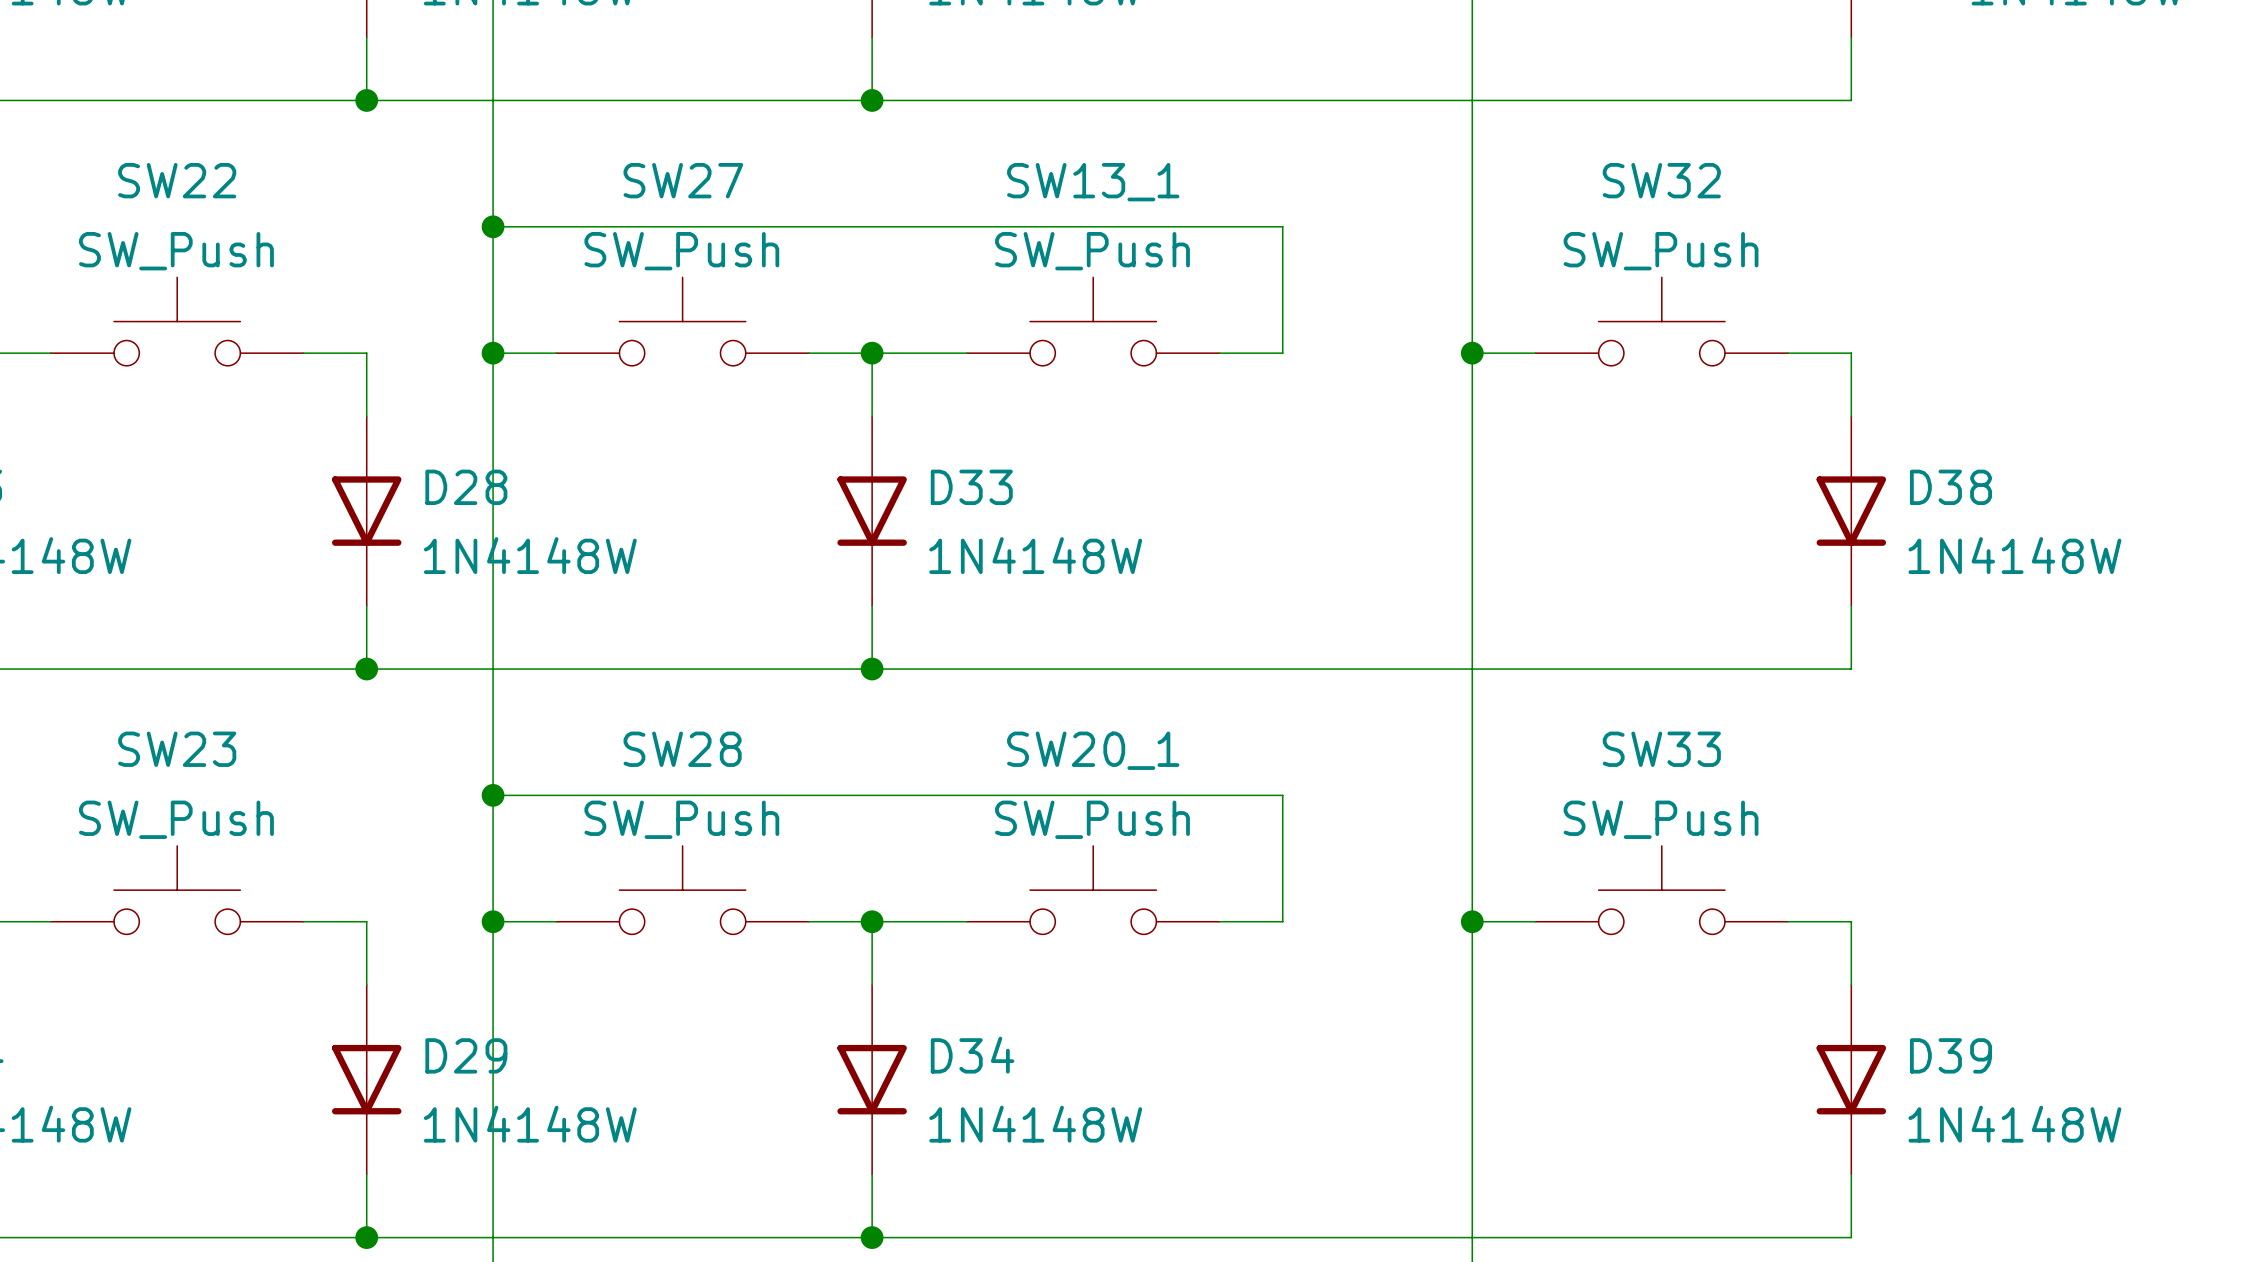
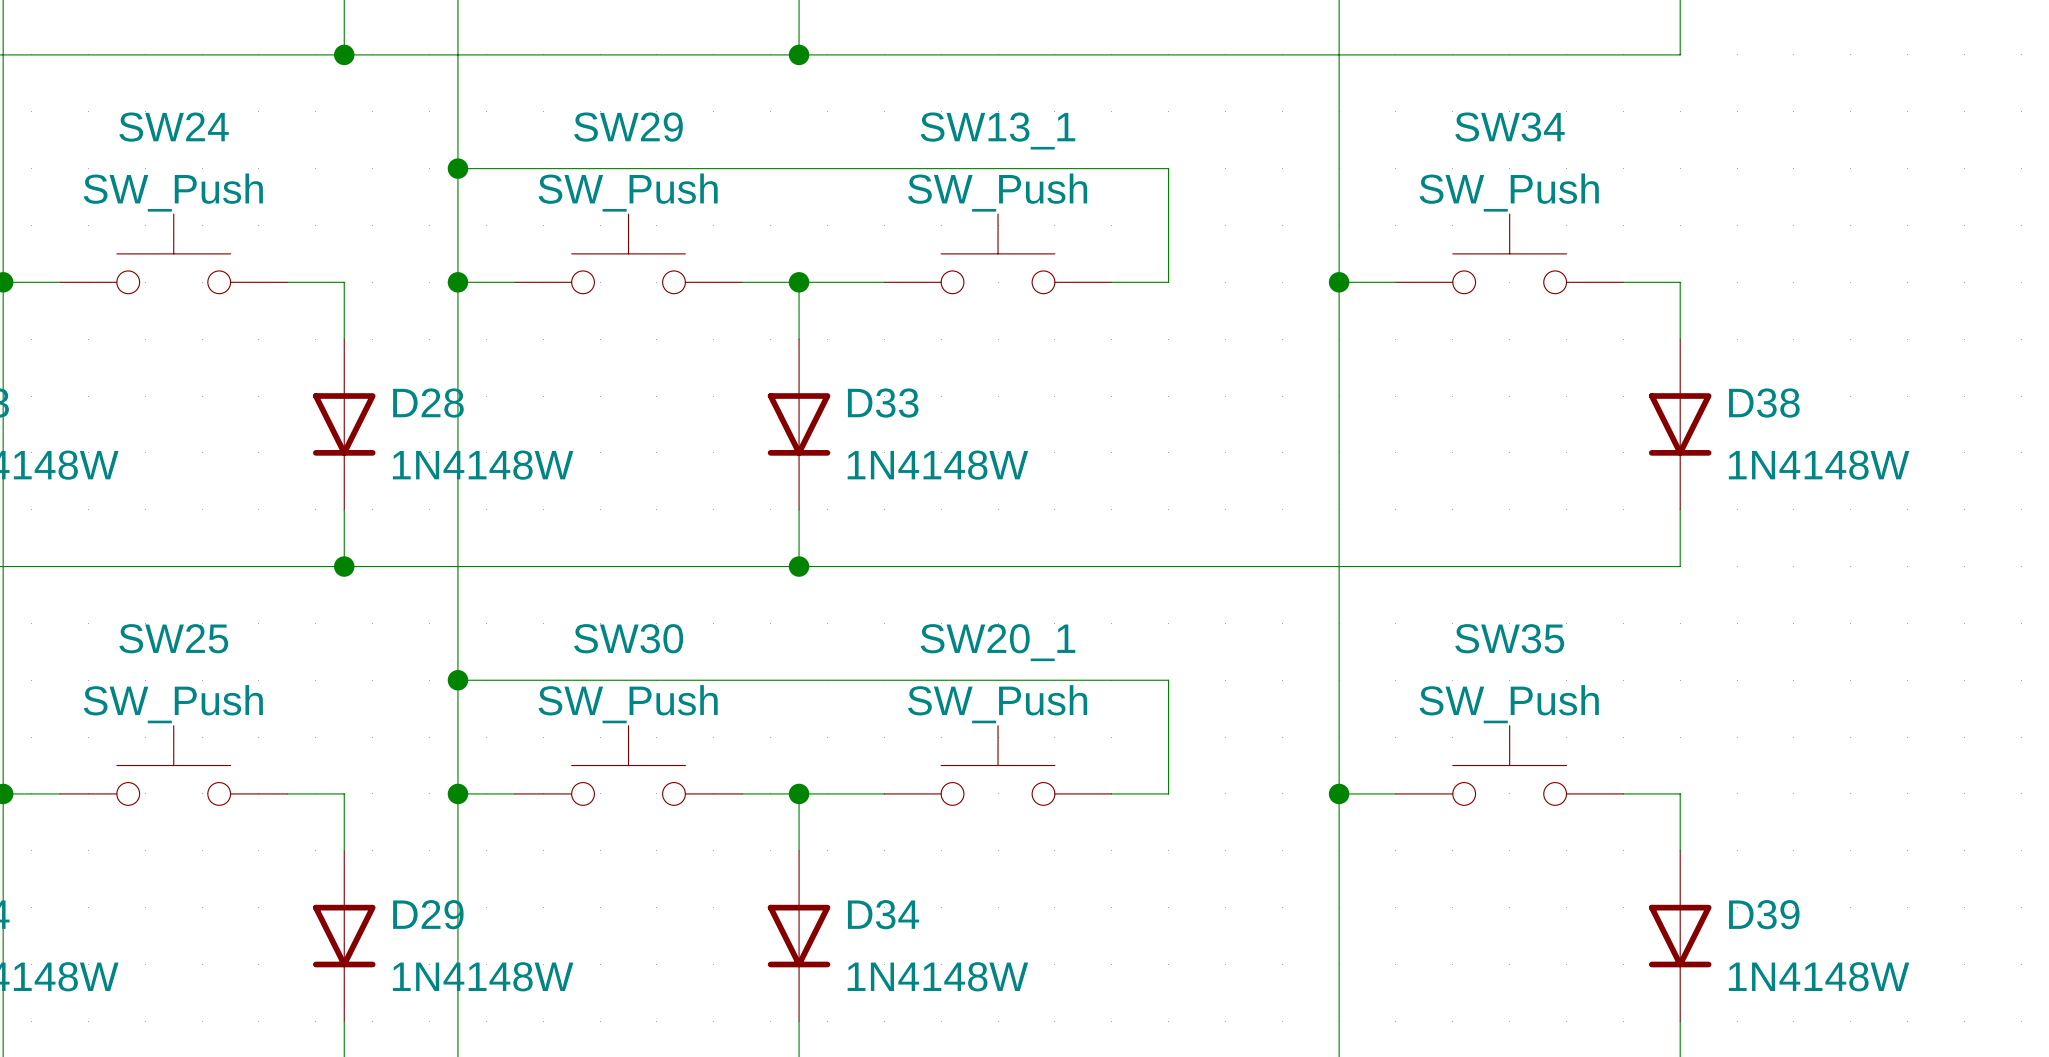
SW22 name: SW22 (177, 180) -> SW24 (174, 127)
SW27 name: SW27 (683, 180) -> SW29 (628, 127)
SW32 name: SW32 (1661, 180) -> SW34 (1509, 127)
SW23 name: SW23 (177, 749) -> SW25 (173, 638)
SW28 name: SW28 (682, 749) -> SW30 (628, 638)
SW33 name: SW33 (1661, 749) -> SW35 (1509, 638)

